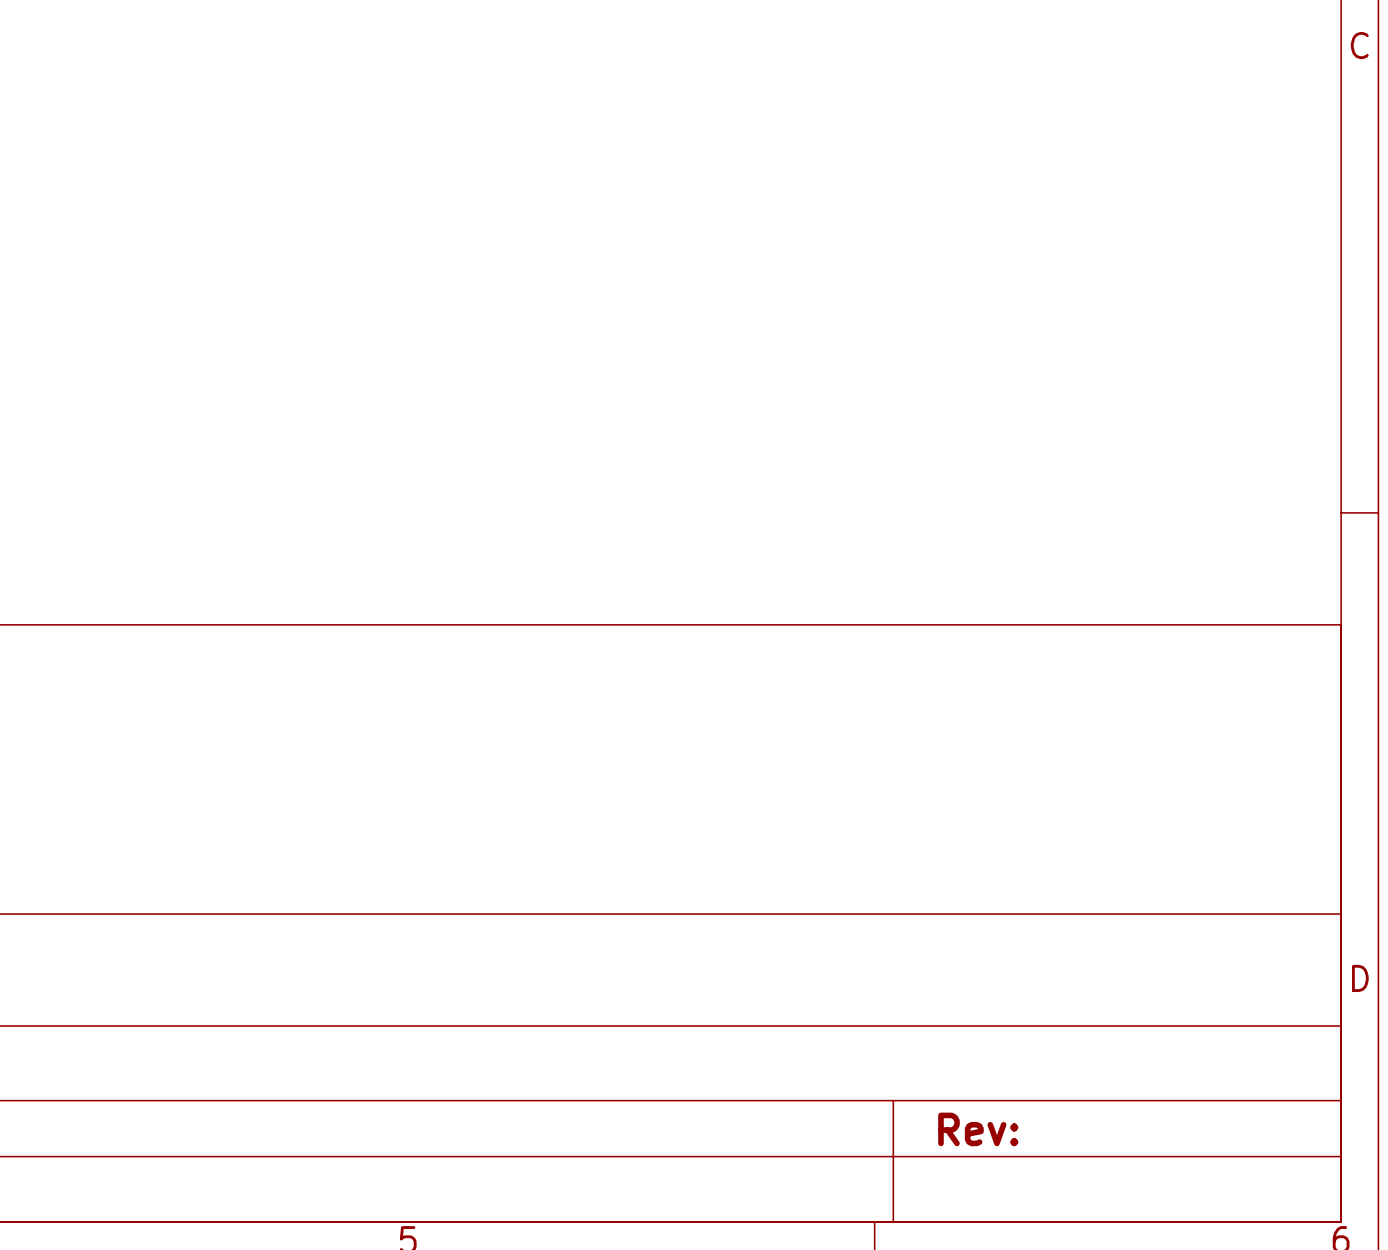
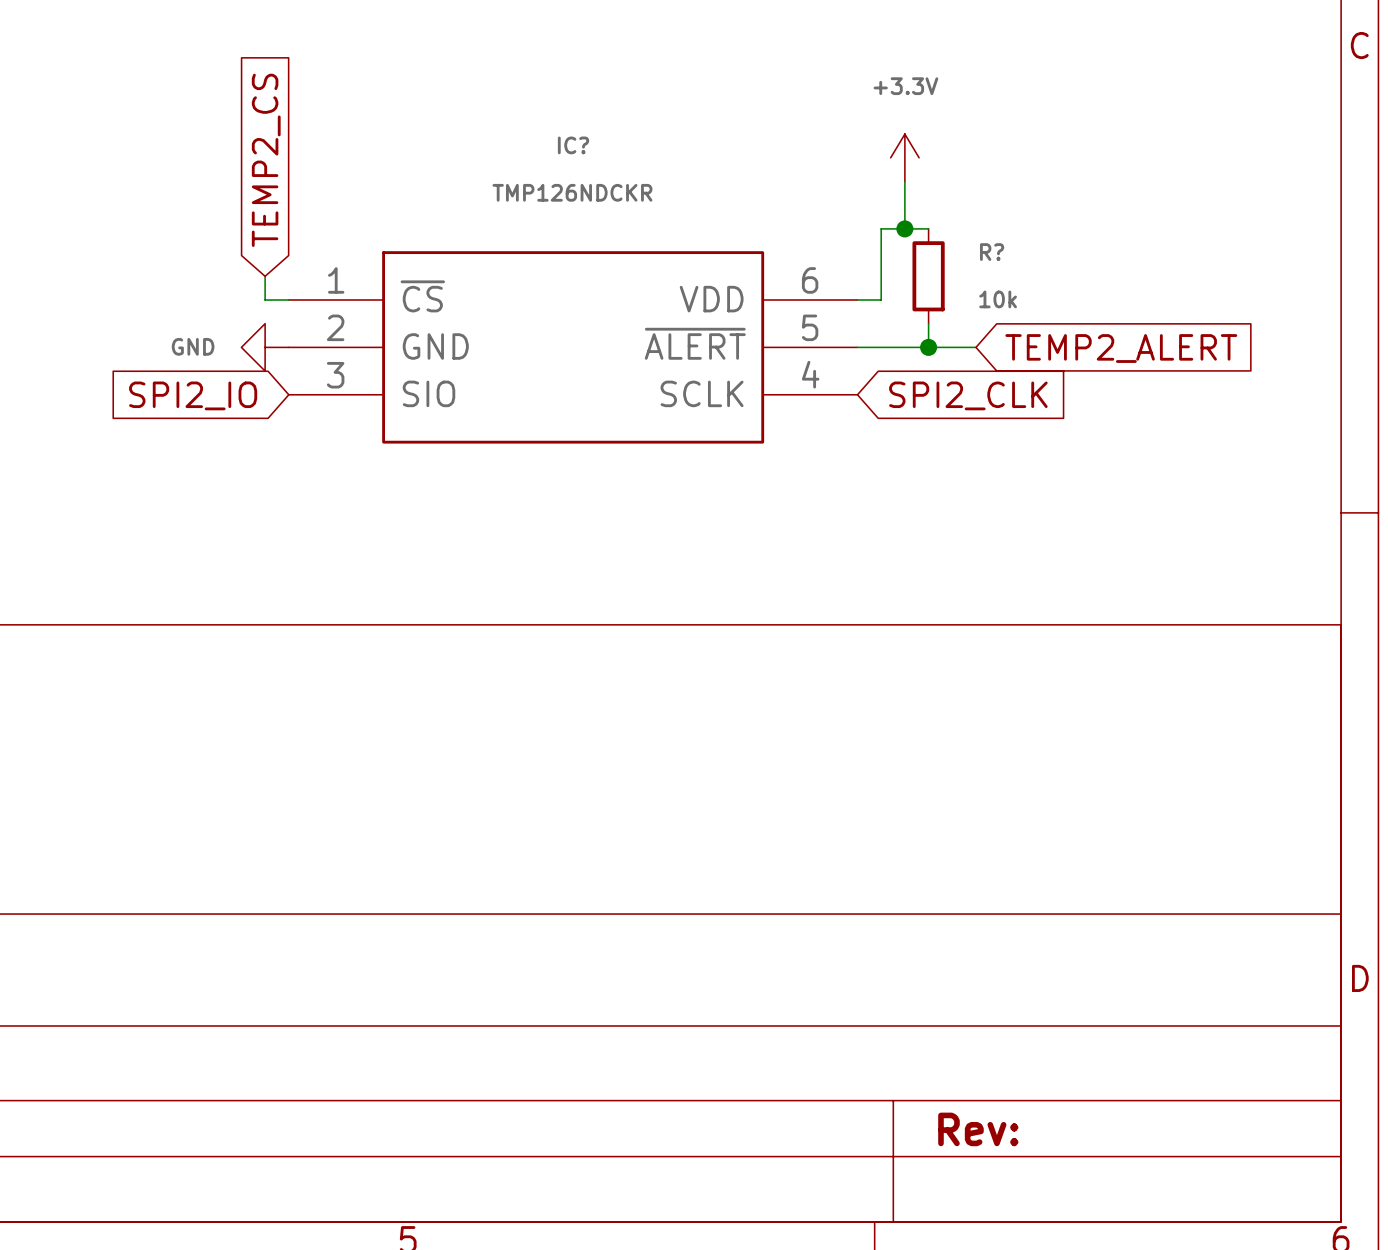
power symbol: none -> +3.3V (904, 157)
global label: none -> TEMP2_CS (266, 160)
wire: none -> (904, 181) (904, 228)
junction: none -> (904, 228)
wire: none -> (928, 228) (881, 228) (881, 300) (857, 300)
wire: none -> (265, 276) (265, 300) (288, 300)
R?: none -> 10k (928, 276)
wire: none -> (928, 323) (928, 347)
power symbol: none -> GND (265, 347)
IC?: none -> TMP126NDCKR (573, 347)
wire: none -> (857, 347) (975, 347)
junction: none -> (928, 347)
global label: none -> TEMP2_ALERT (1121, 348)
global label: none -> SPI2_IO (193, 395)
global label: none -> SPI2_CLK (968, 395)

